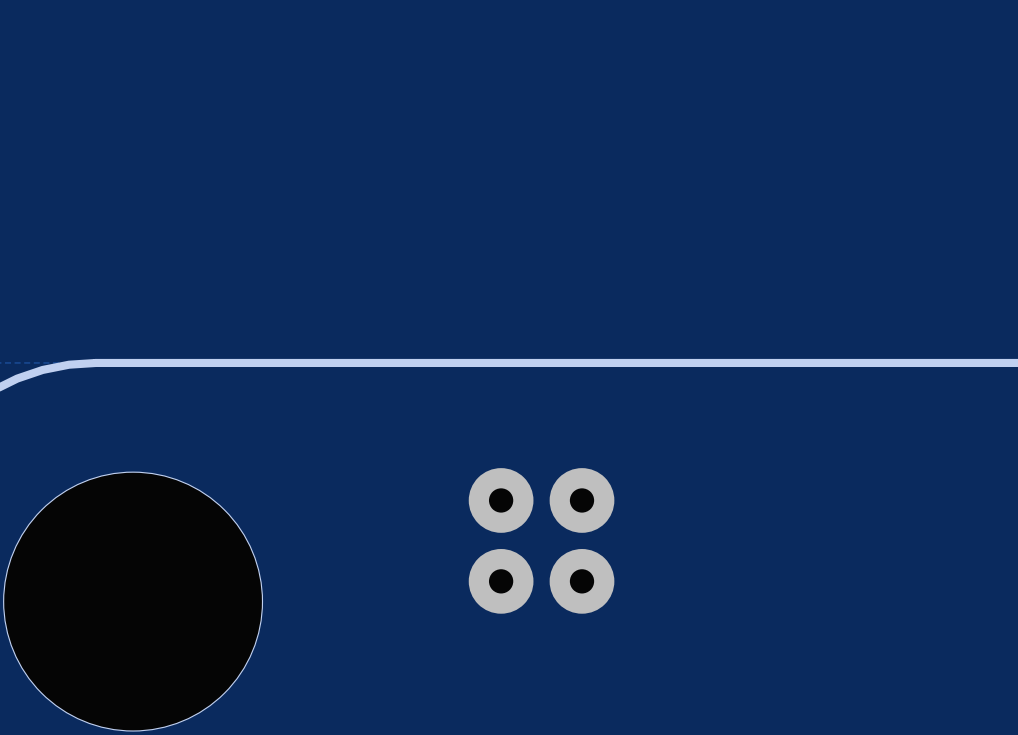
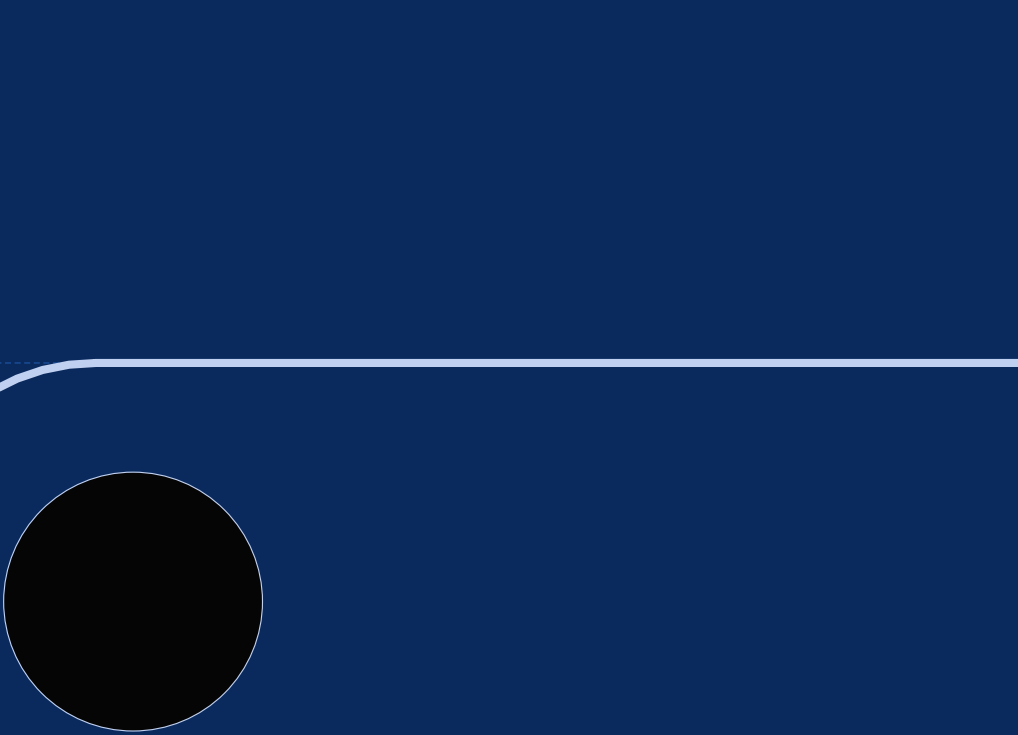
via: (501, 500) -> none
via: (582, 500) -> none
via: (501, 581) -> none
via: (582, 581) -> none

